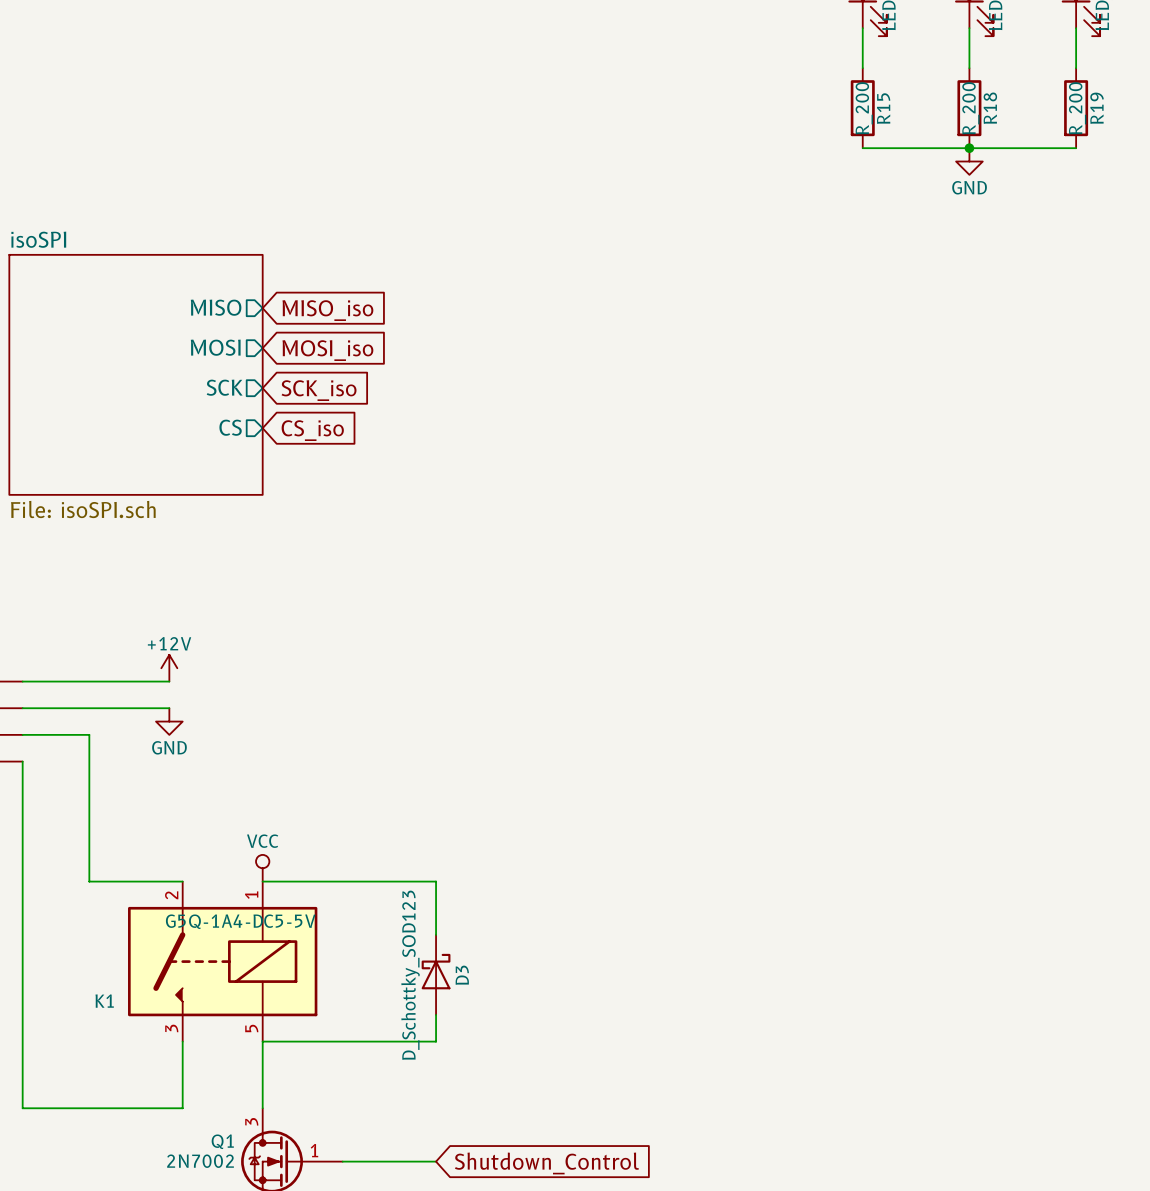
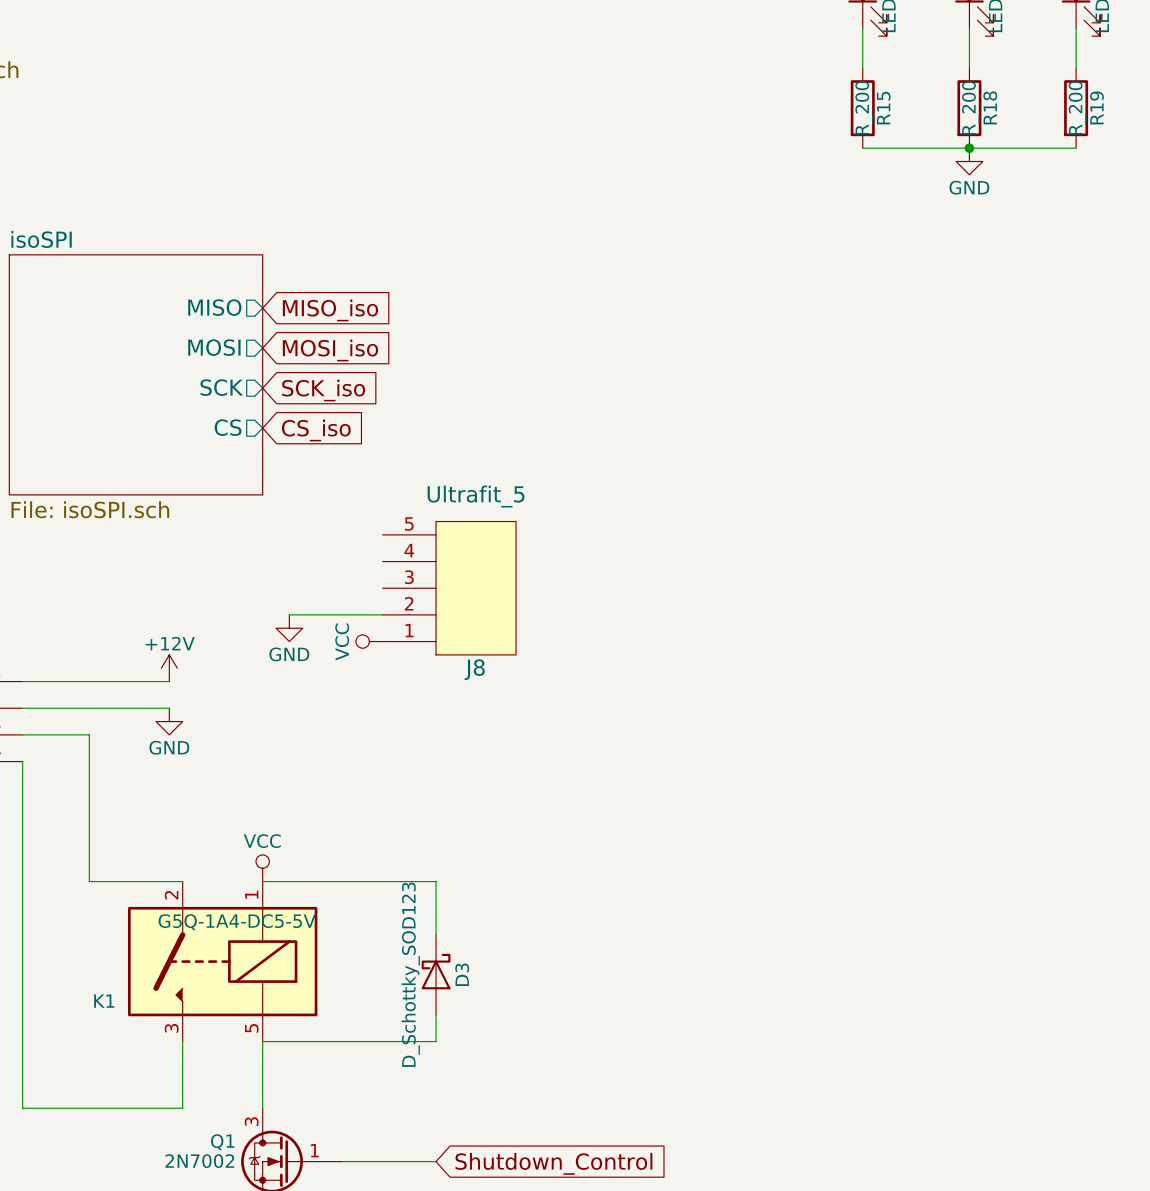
J8: none -> Ultrafit_5 (449, 588)
wire: none -> (289, 614) (382, 614)
power symbol: none -> GND (289, 628)
power symbol: none -> VCC (369, 641)

